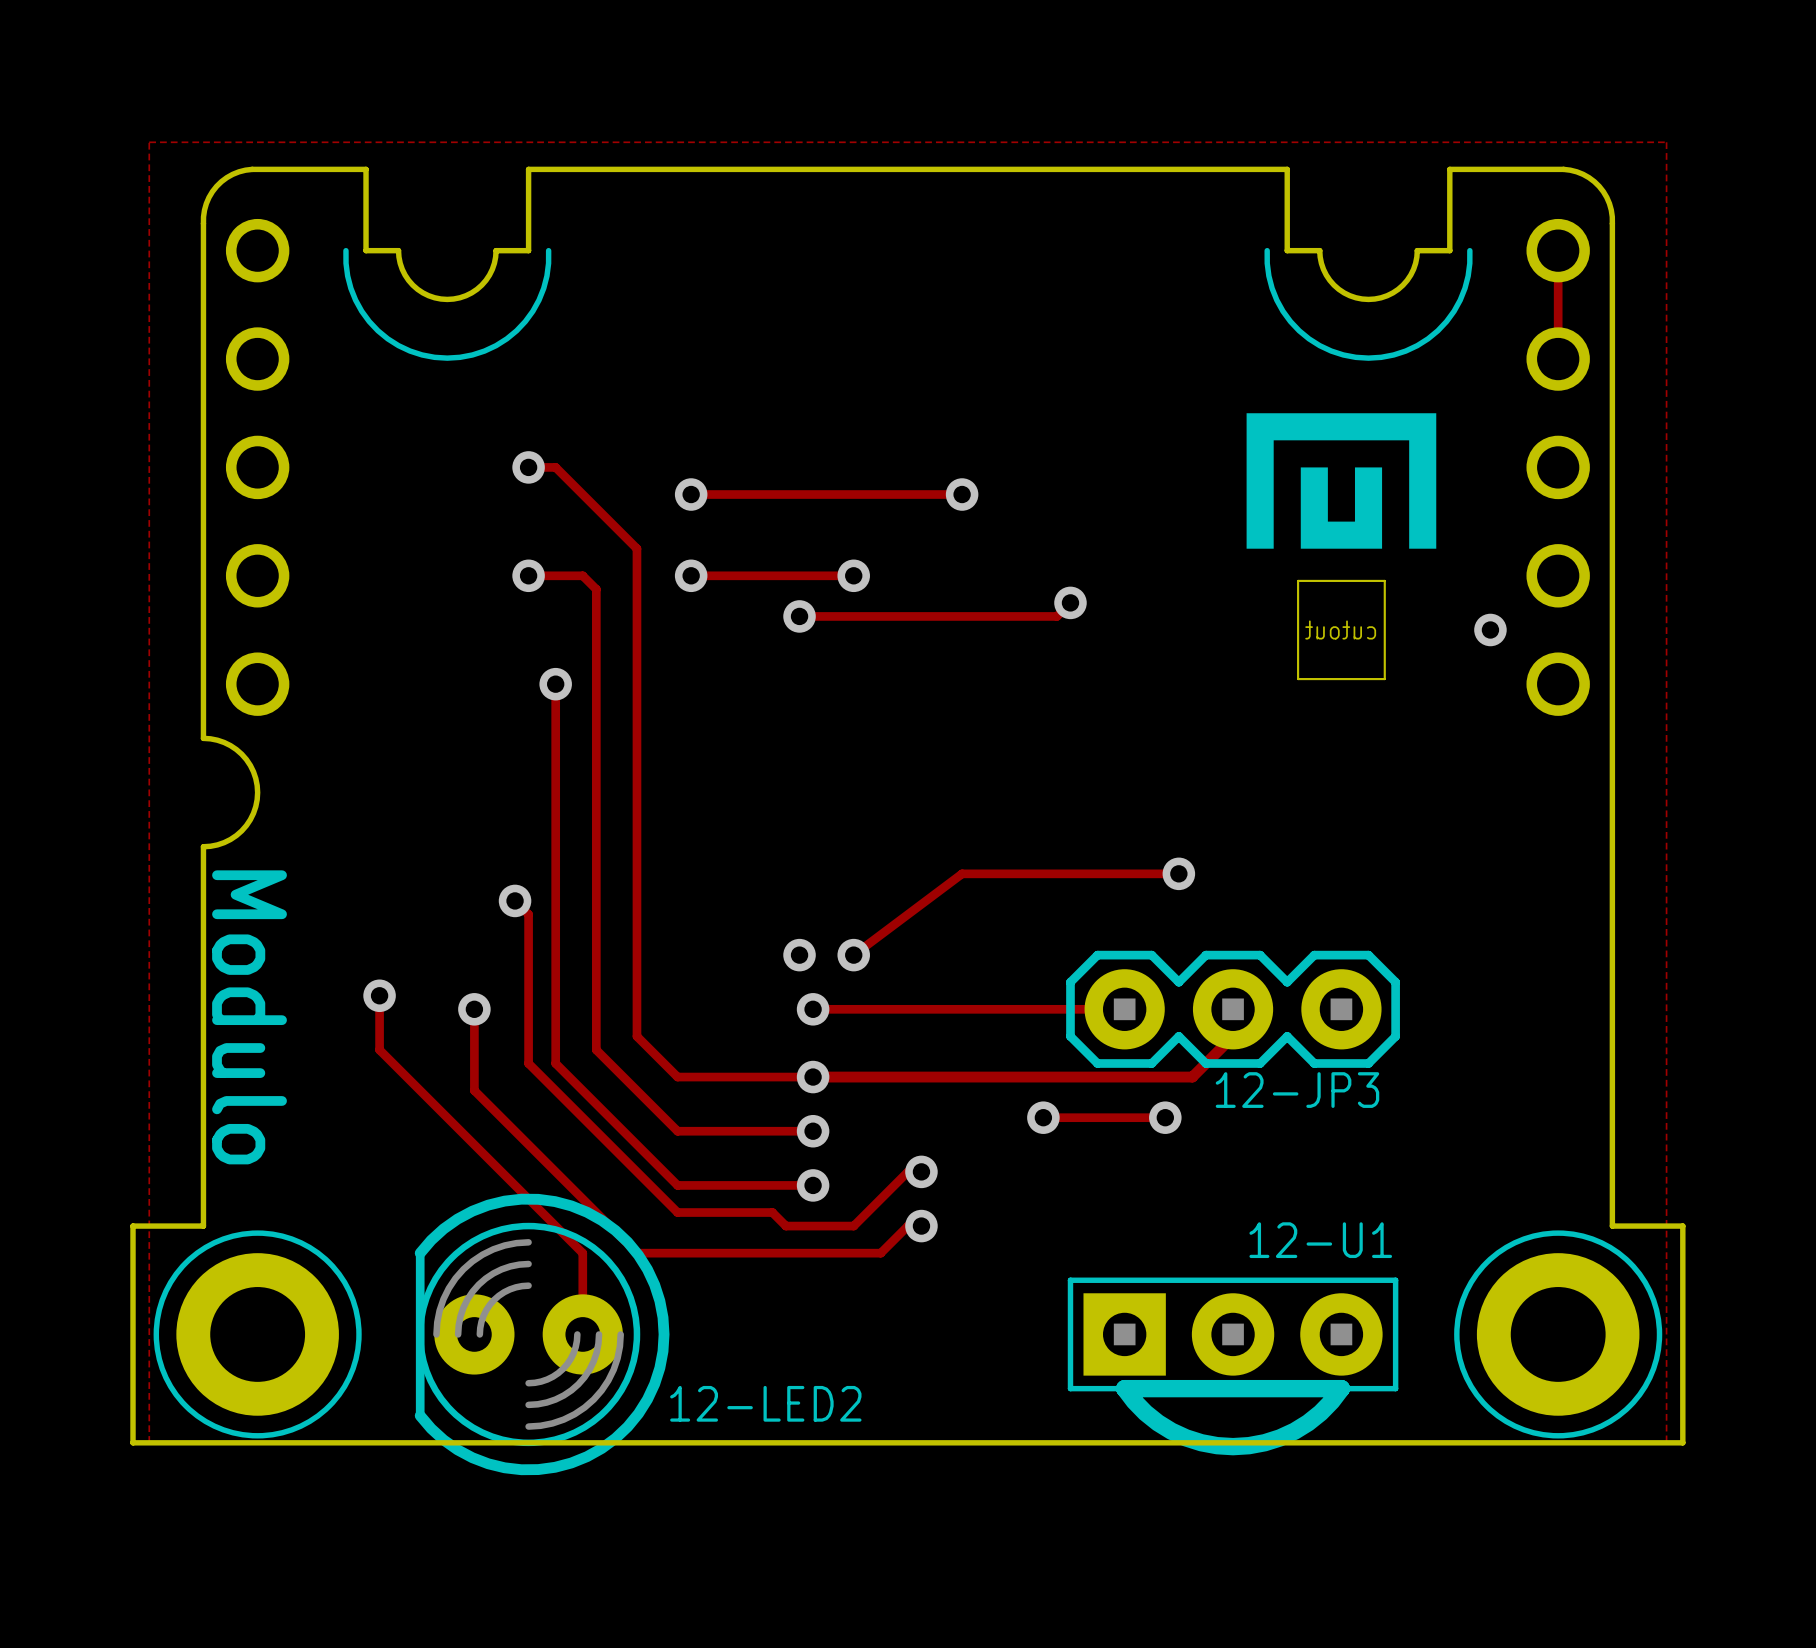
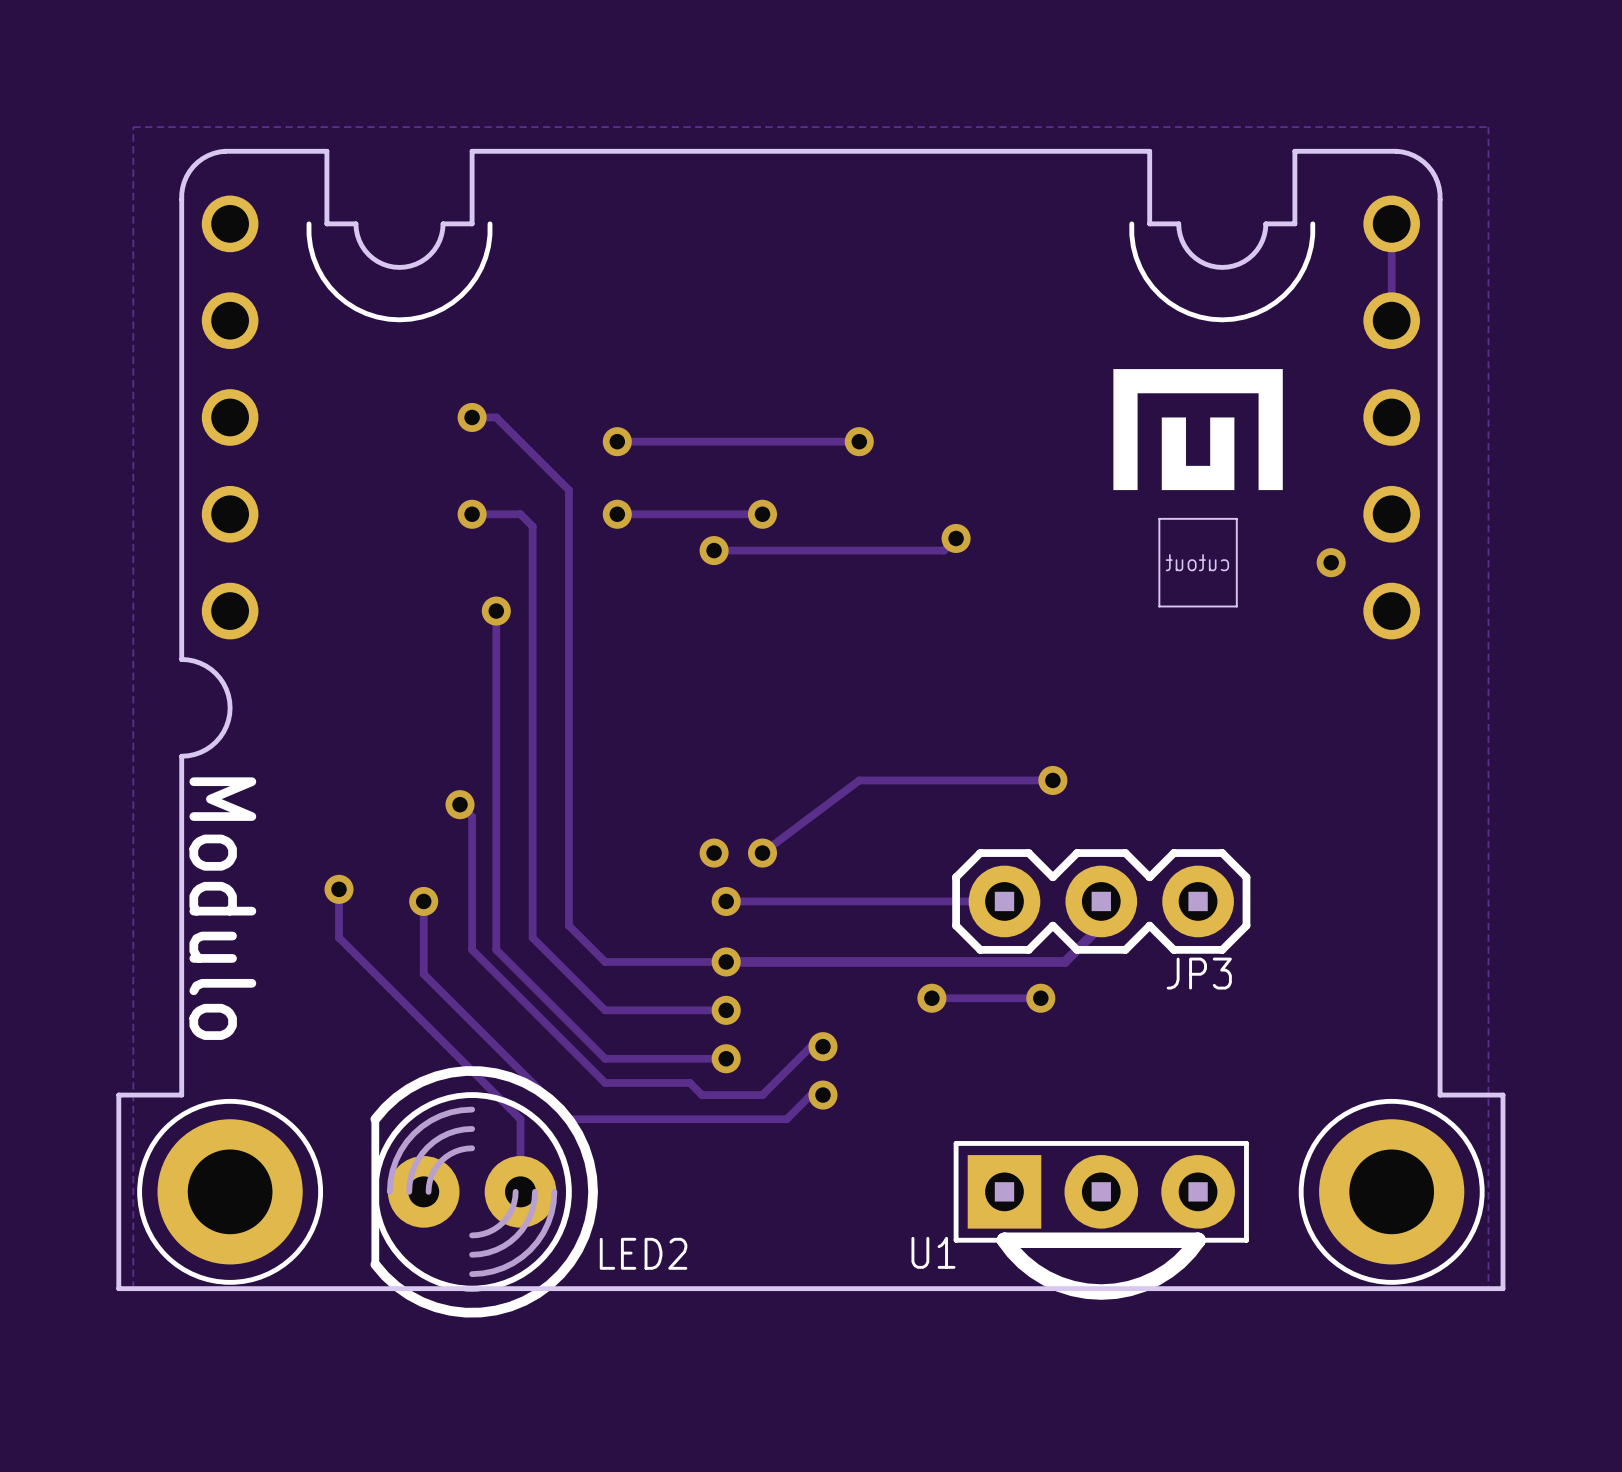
12-JP3 name: 12-JP3 (1297, 1090) -> JP3 (1199, 973)
12-U1 name: 12-U1 (1320, 1240) -> U1 (933, 1252)
12-LED2 name: 12-LED2 (765, 1403) -> LED2 (643, 1253)

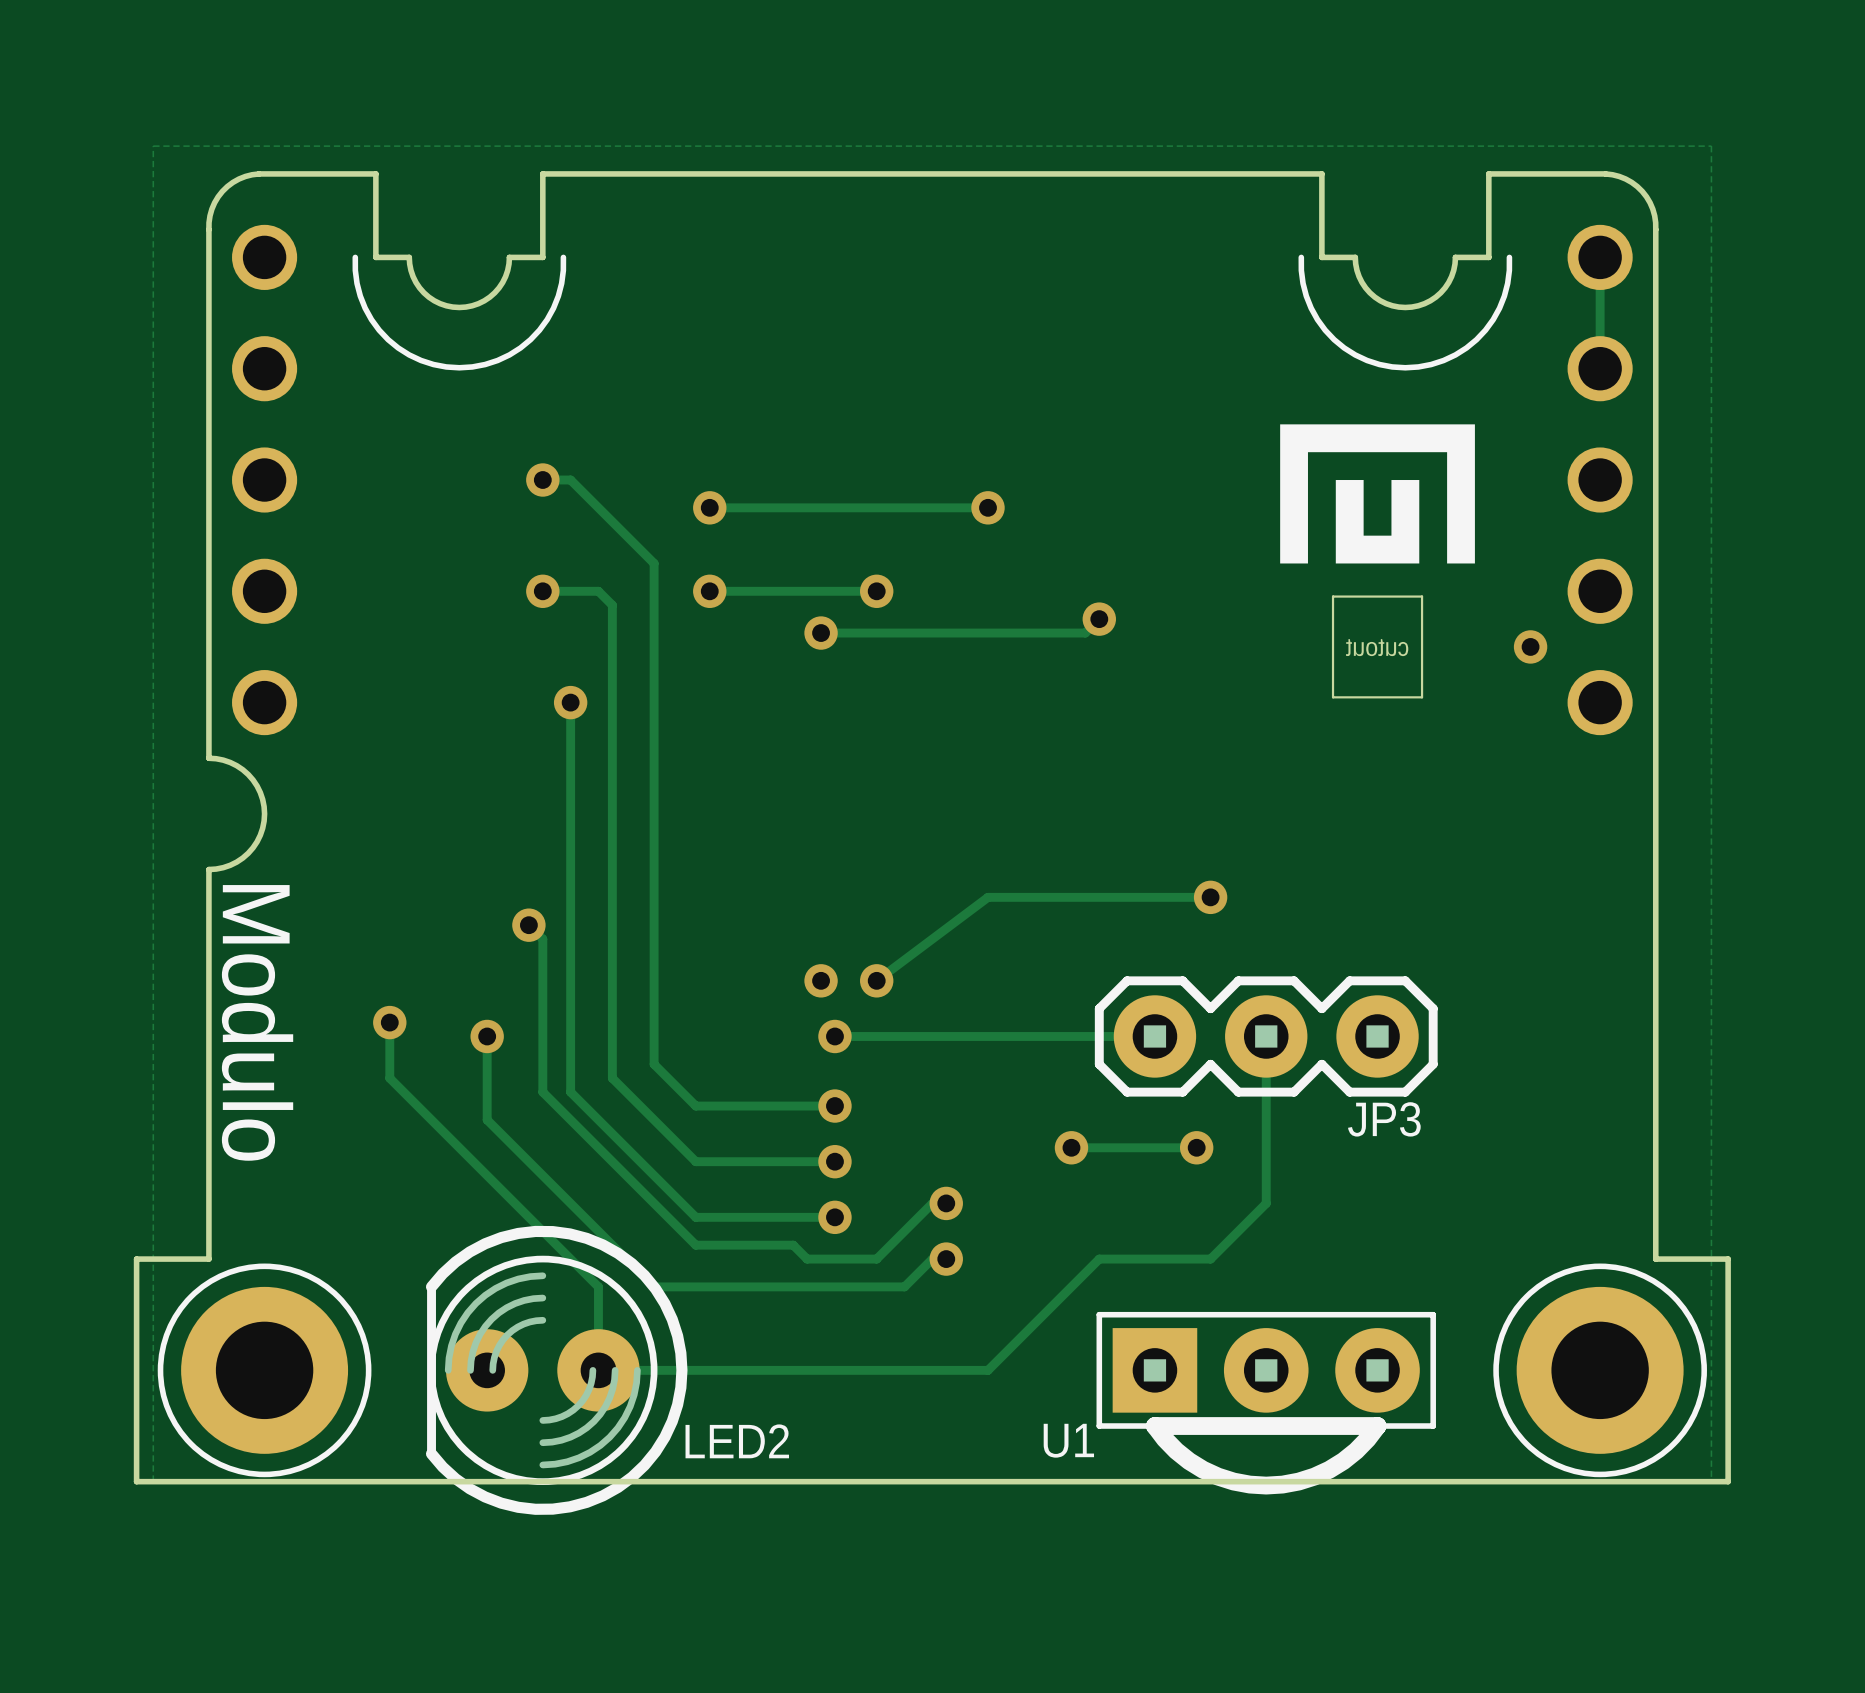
track: (1101, 925) (1064, 961) (726, 961) -> (1266, 1064) (1266, 1203) (1210, 1259) (1099, 1259) (988, 1370) (598, 1370)

